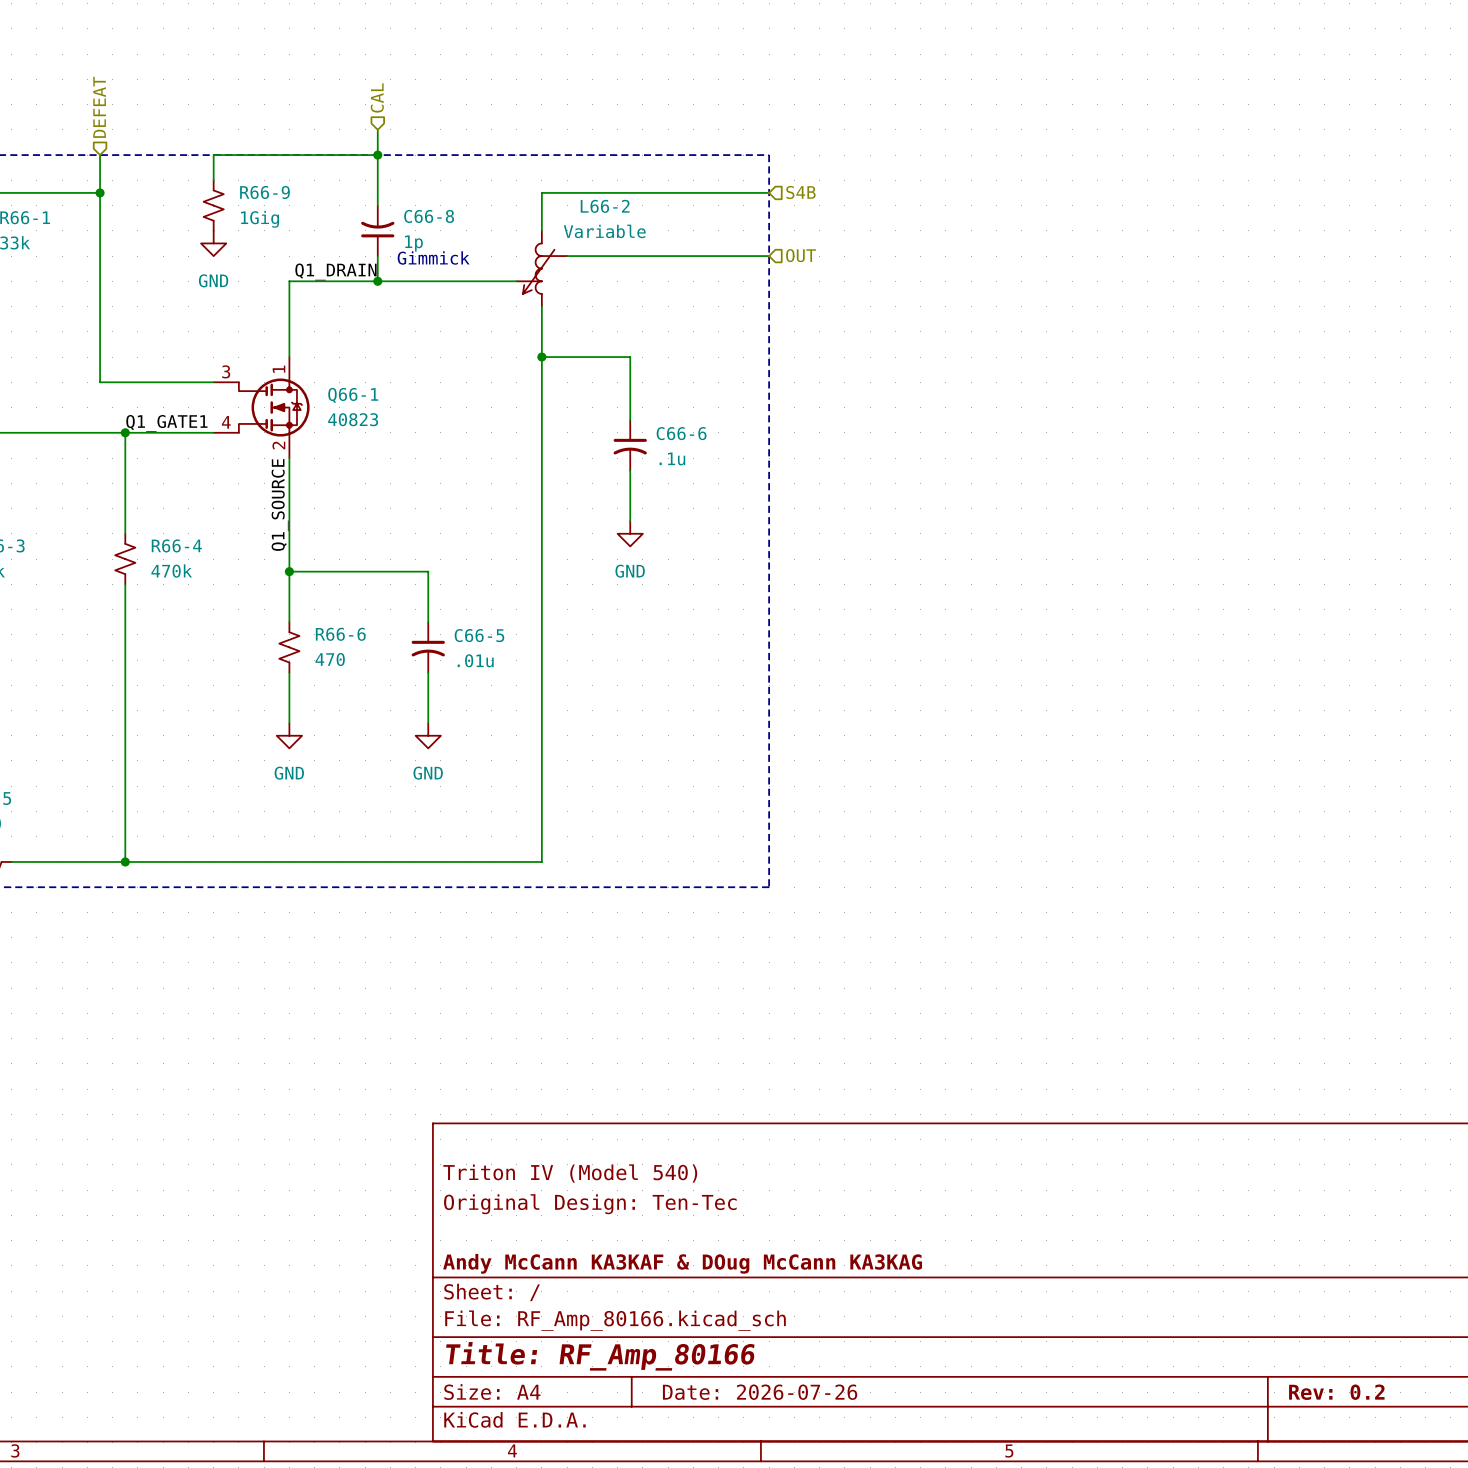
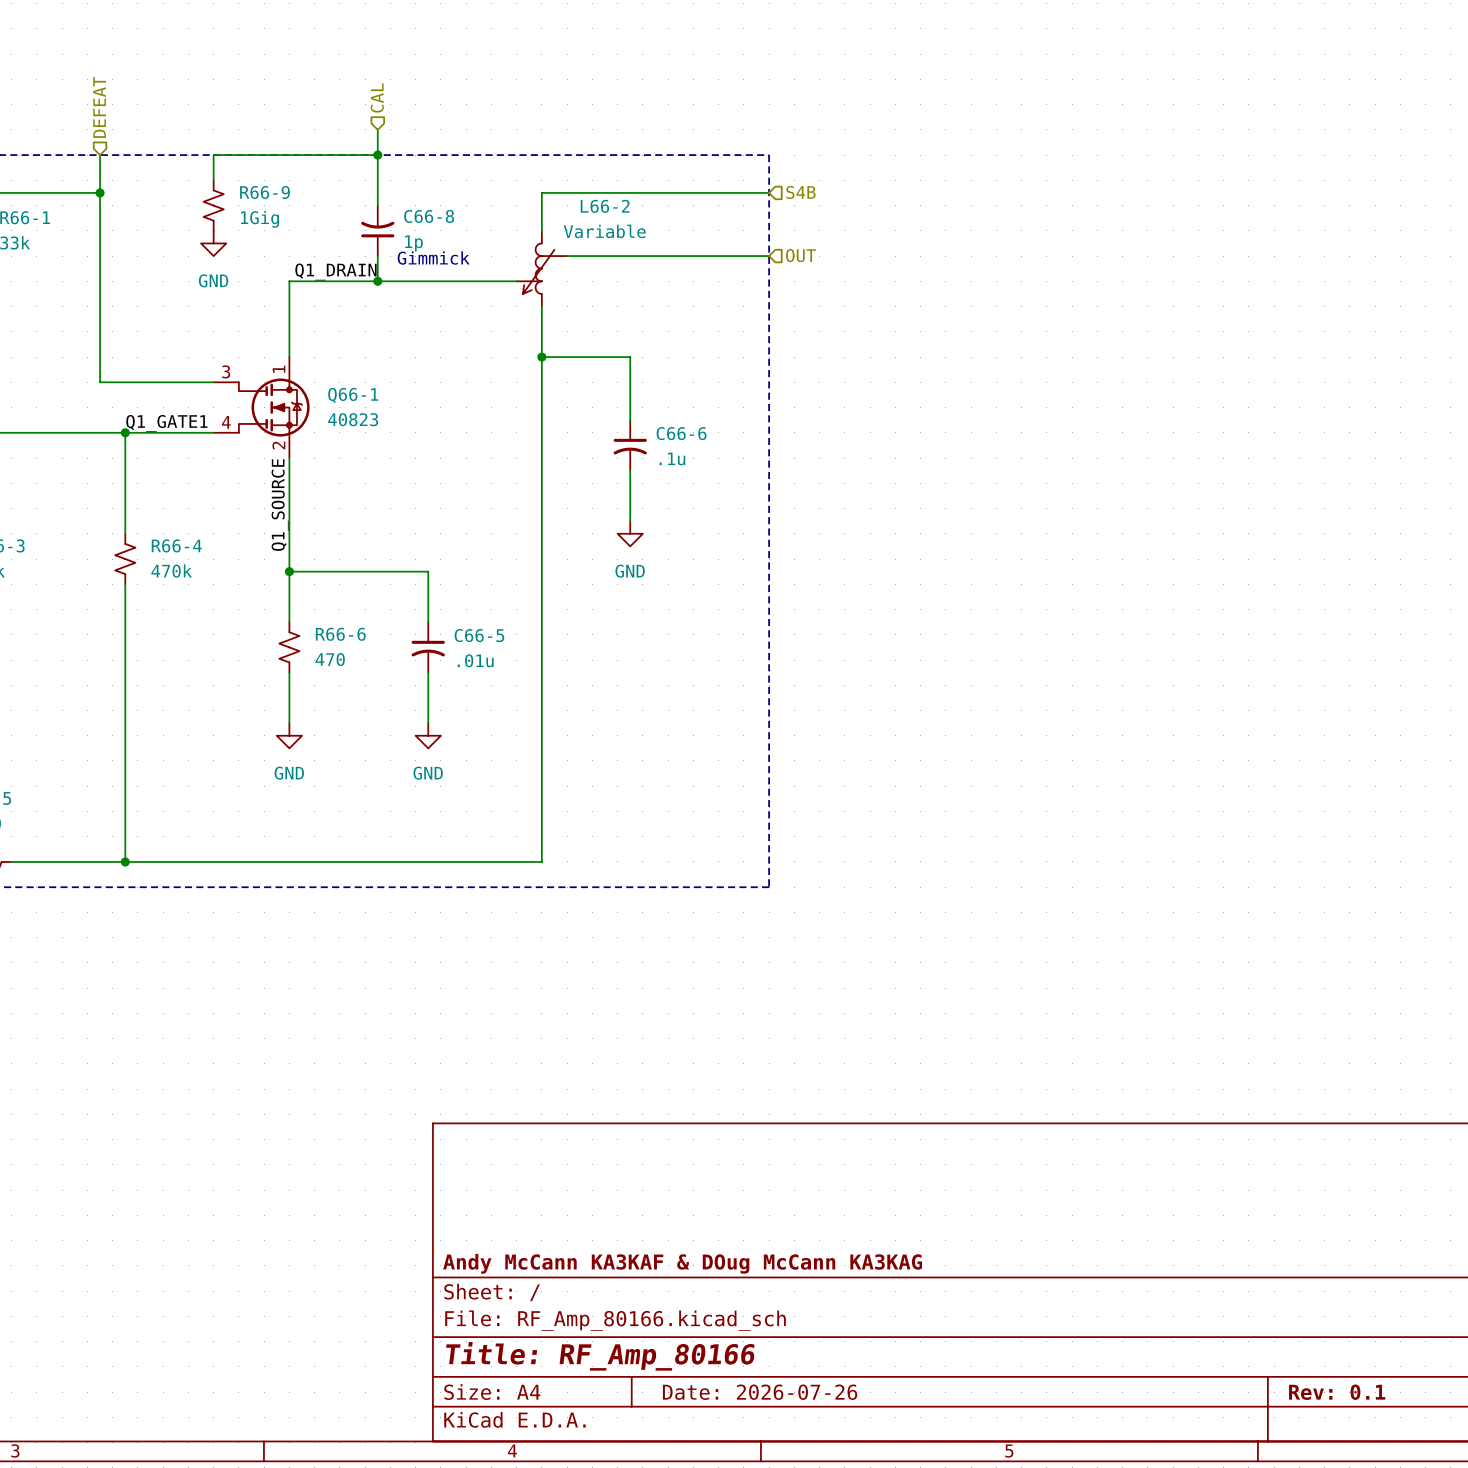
title block: Triton IV (Model 540) (570, 1173) -> none
title block: Original Design: Ten-Tec (590, 1204) -> none
title block: Rev: 0.2 (1336, 1392) -> Rev: 0.1 (1337, 1392)

